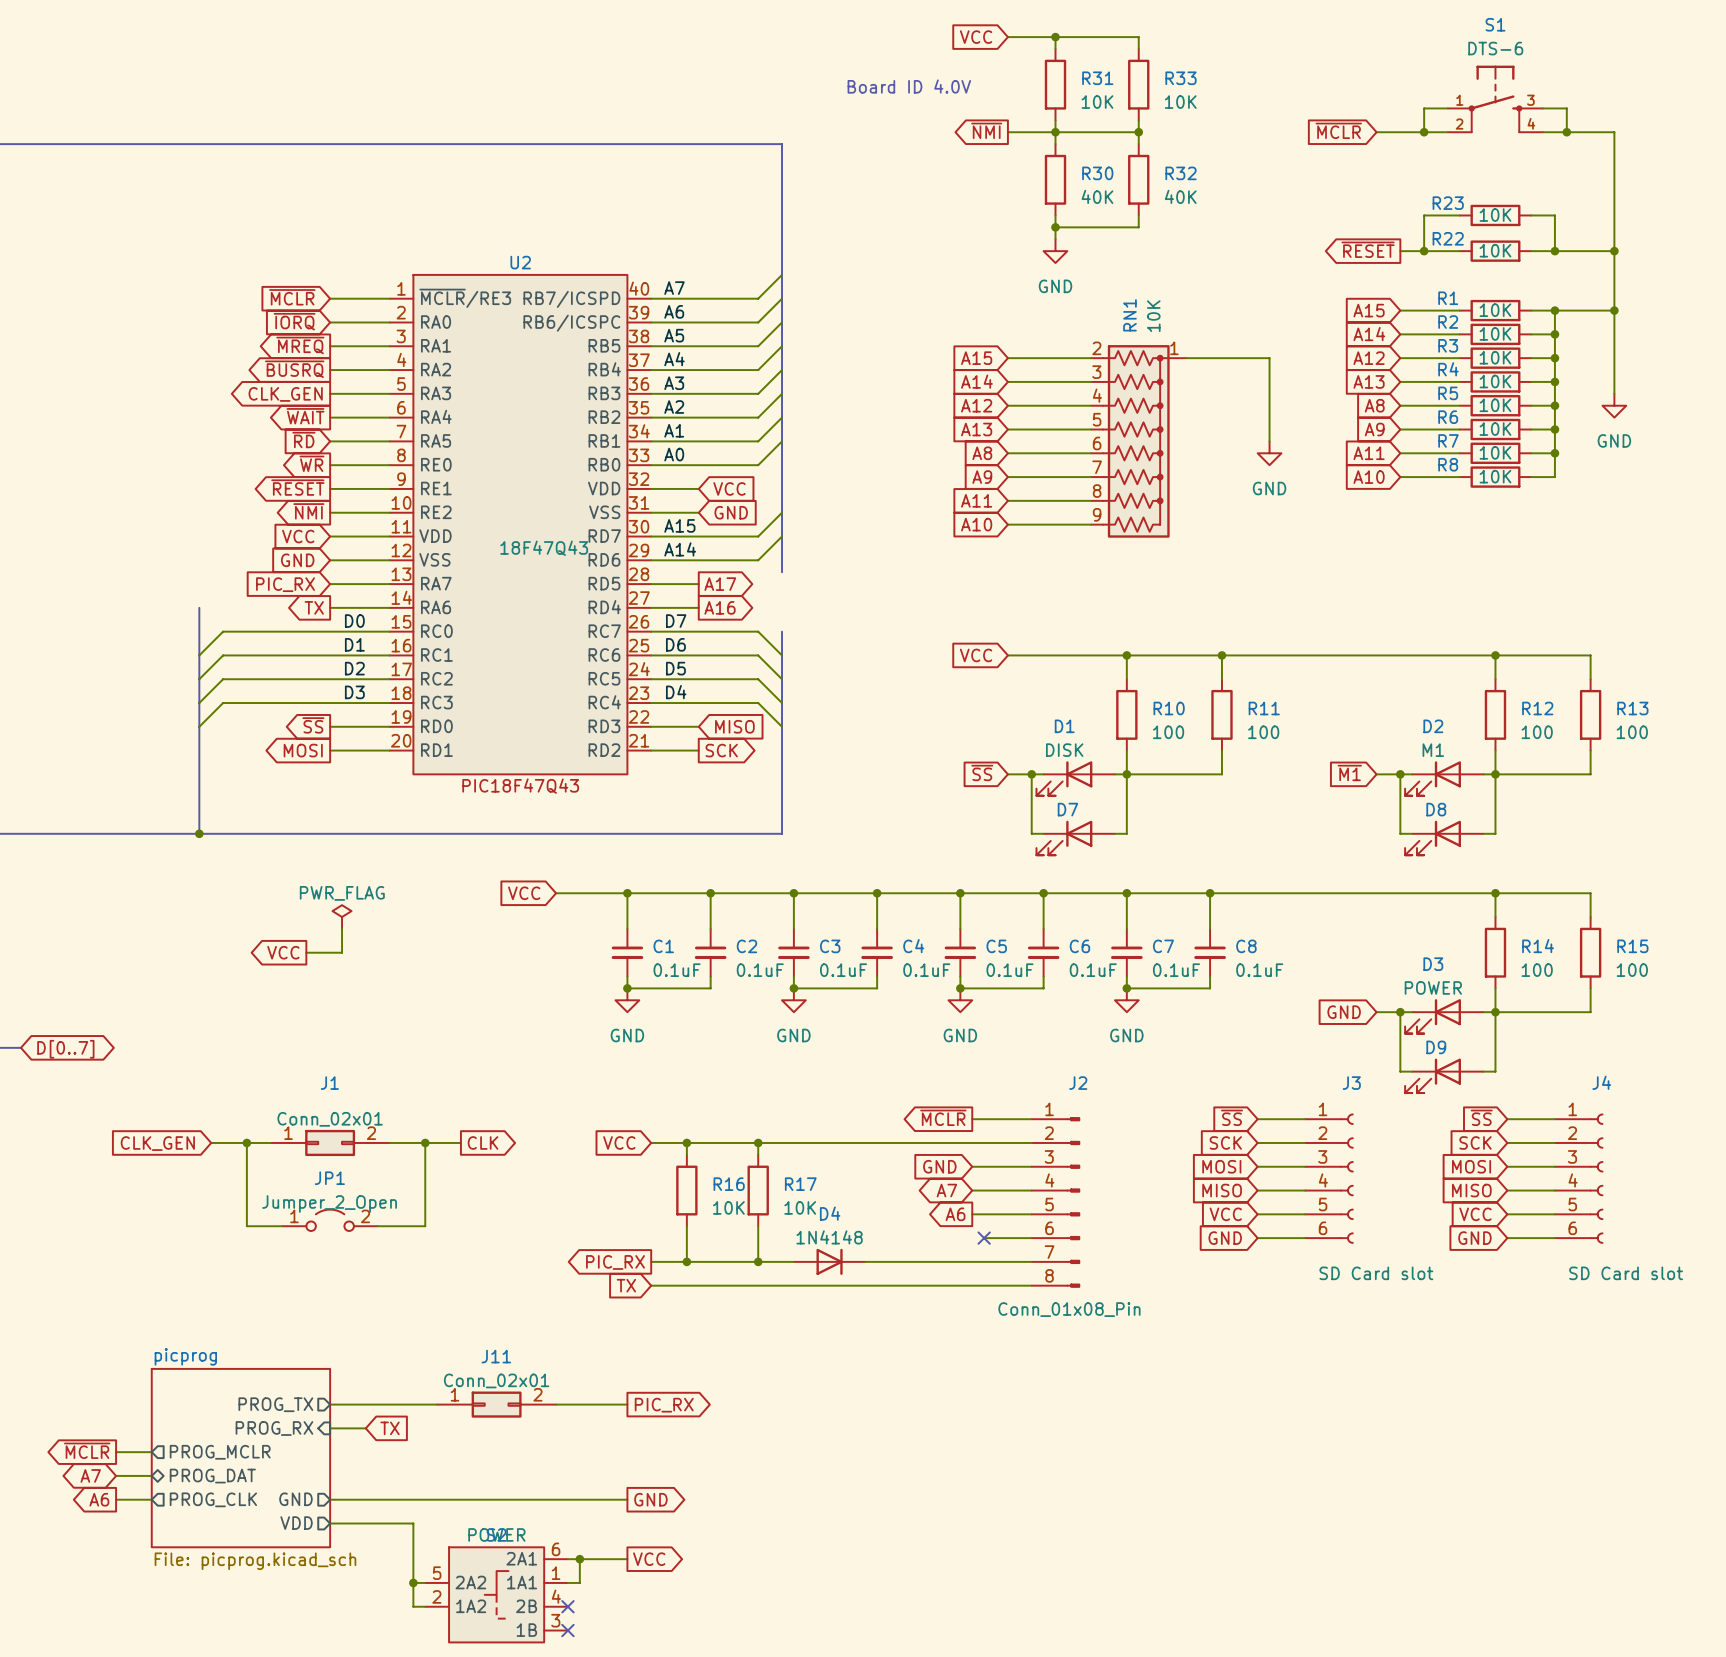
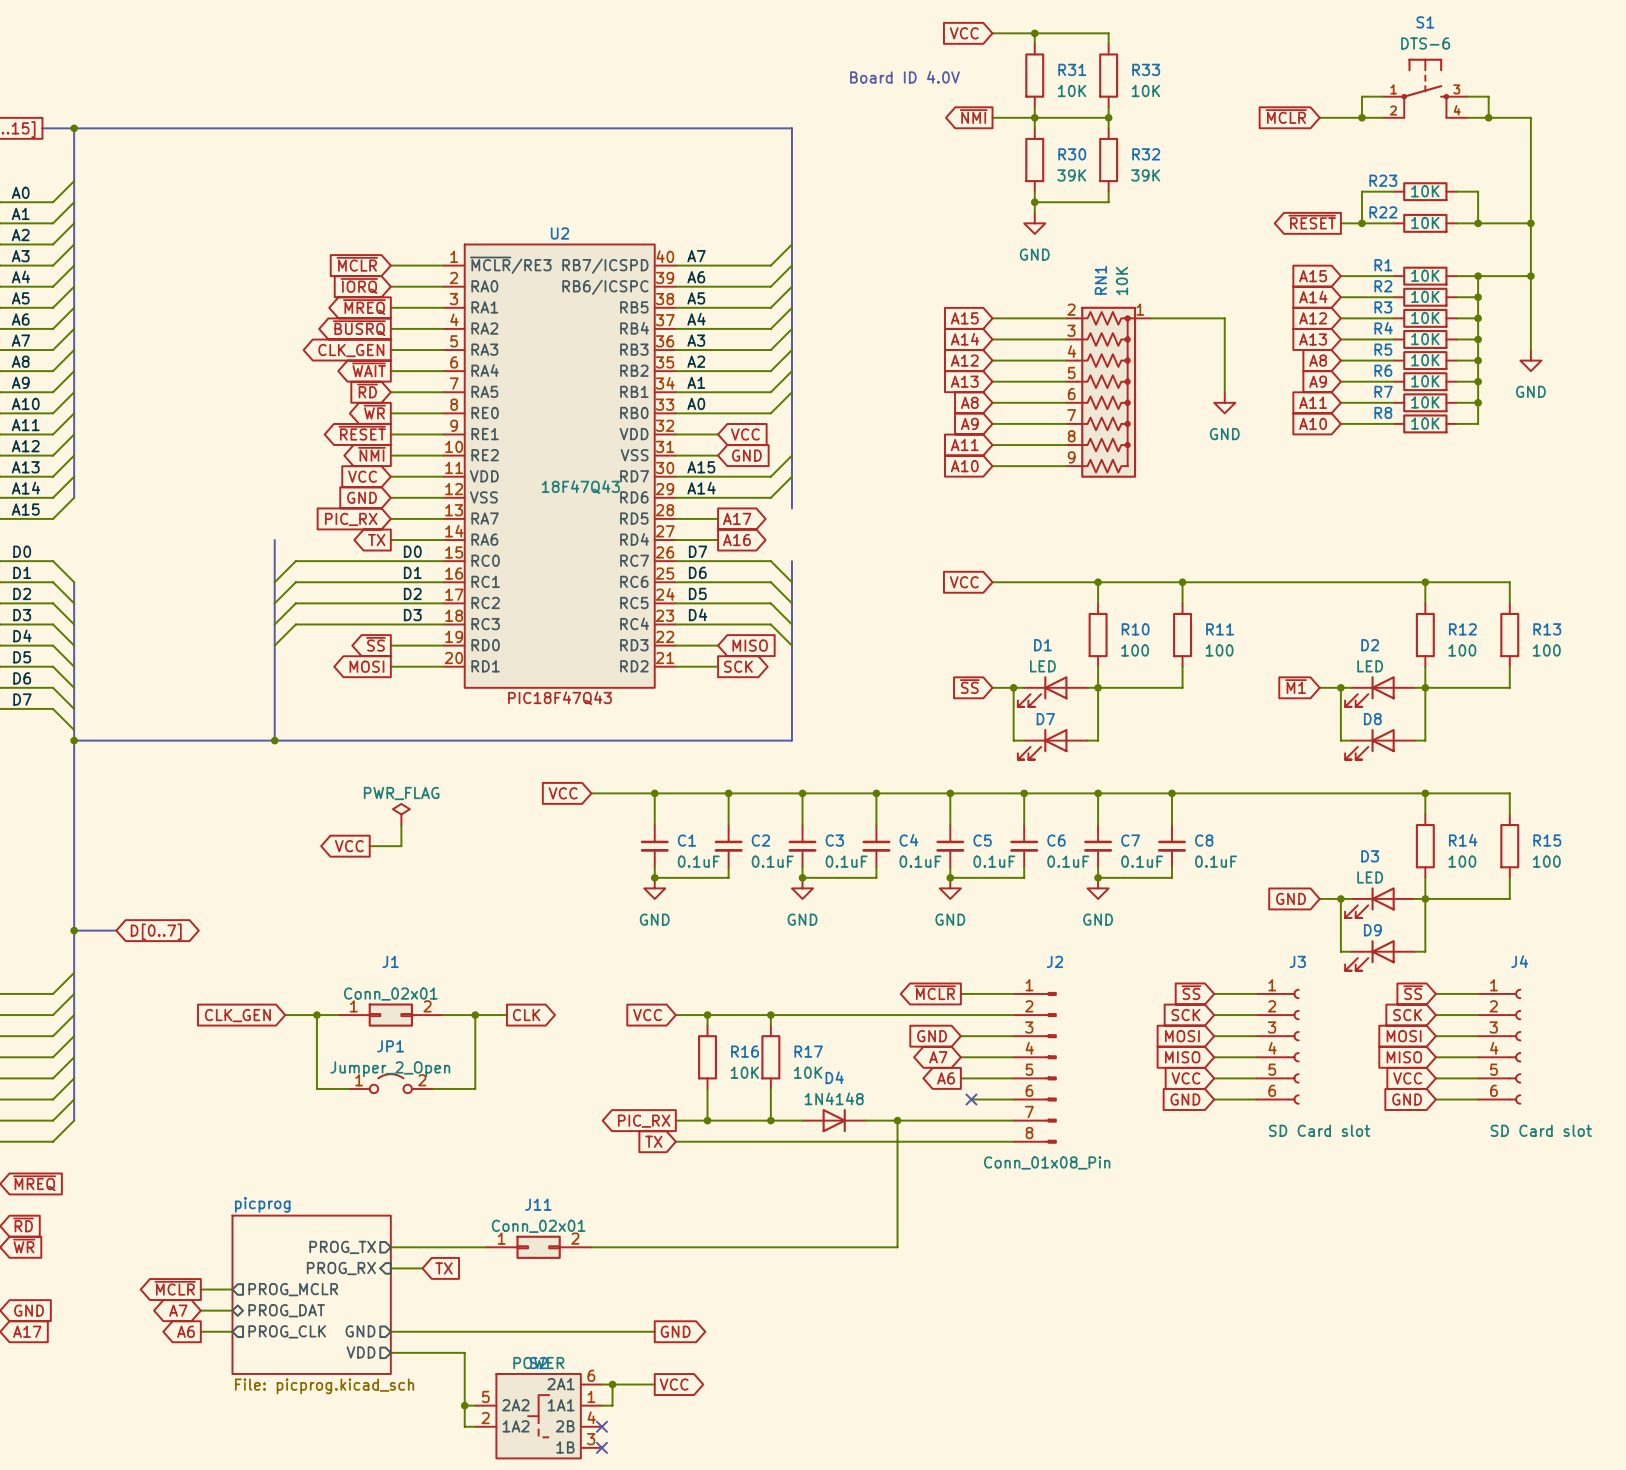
R30 value: 40K (1097, 196) -> 39K (1071, 175)
R32 value: 40K (1180, 196) -> 39K (1145, 175)
D1 value: DISK (1064, 750) -> LED (1042, 666)
D2 value: M1 (1433, 750) -> LED (1370, 666)
D3 value: POWER (1433, 987) -> LED (1370, 877)
wire: none -> (897, 1120) (897, 1247) (654, 1247)
junction: none -> (897, 1120)
global label: PIC_RX (664, 1405) -> none

